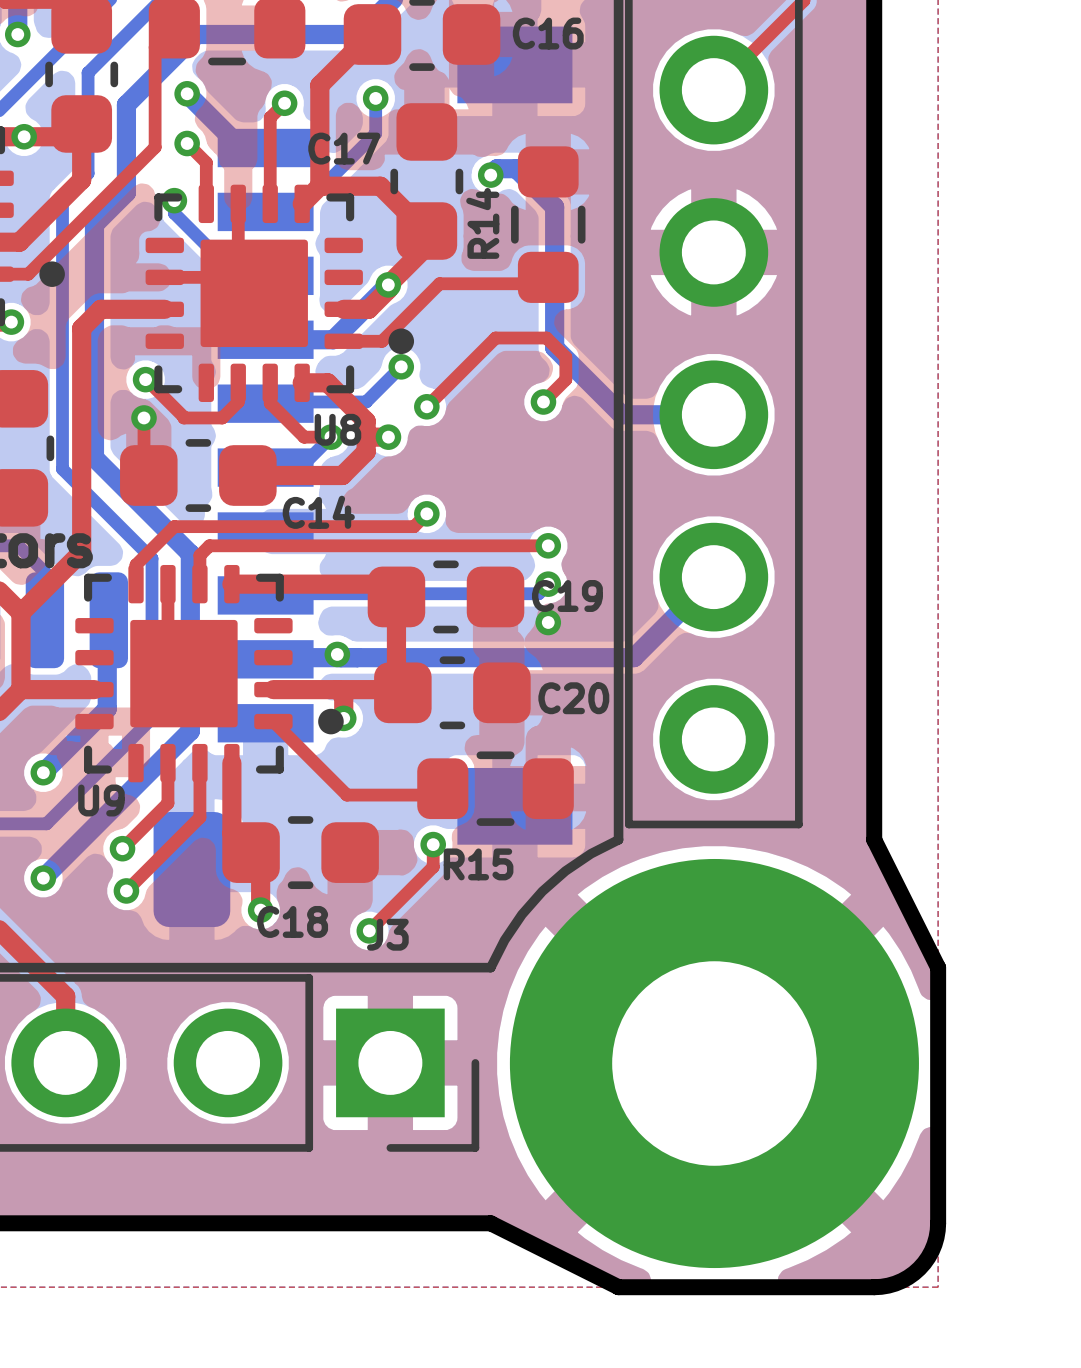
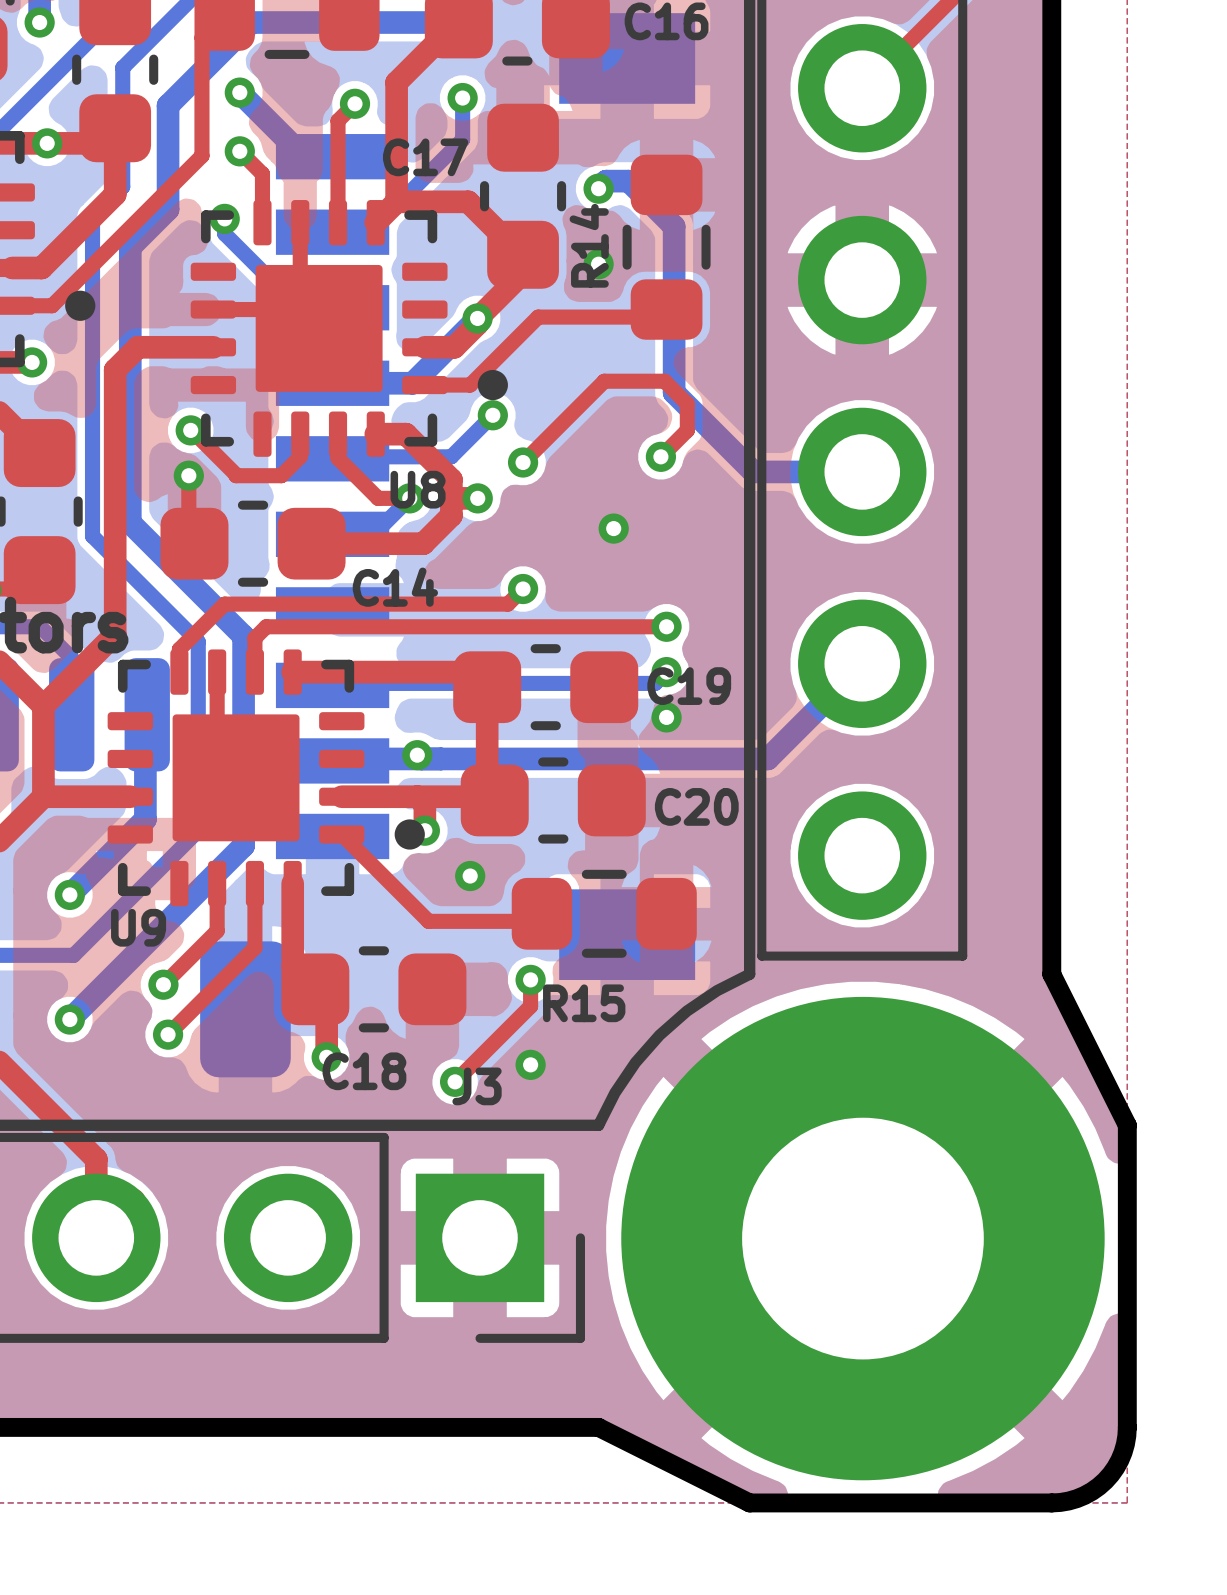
via: none -> (598, 264)
via: none -> (613, 528)
via: none -> (470, 876)
via: none -> (530, 1064)

